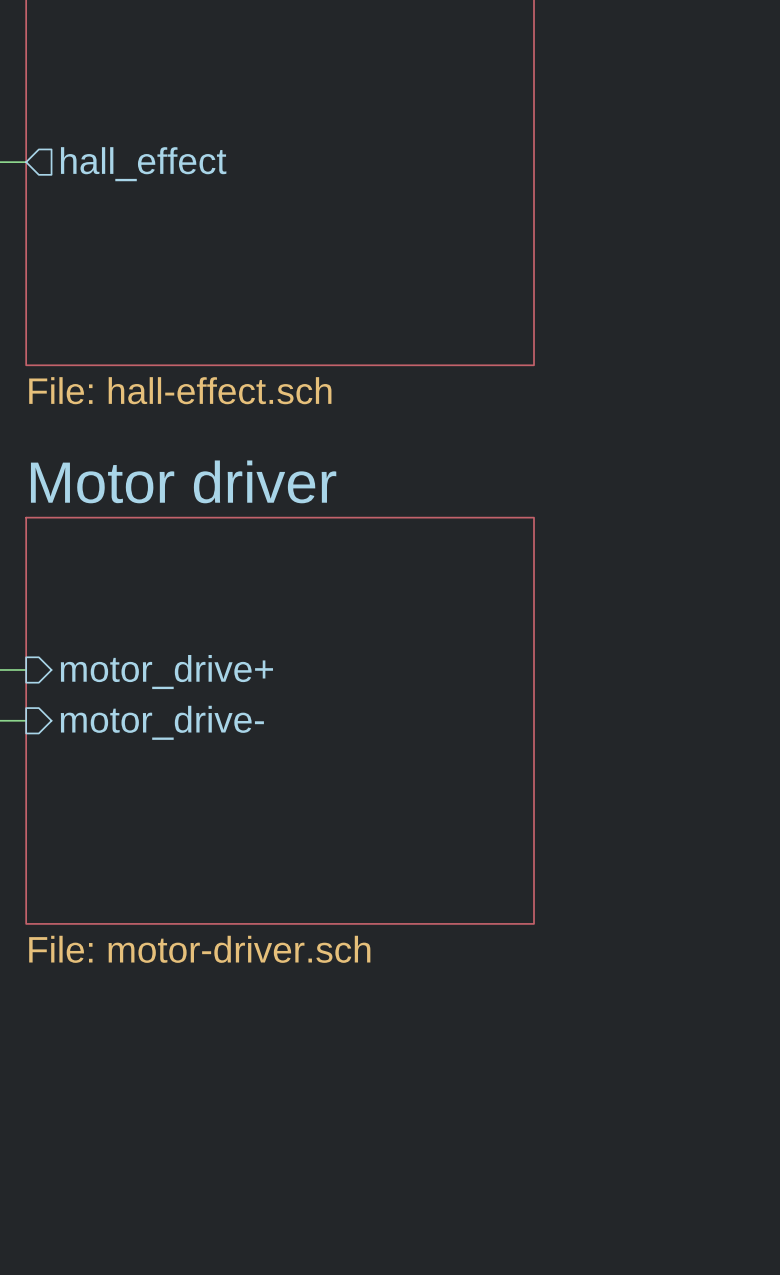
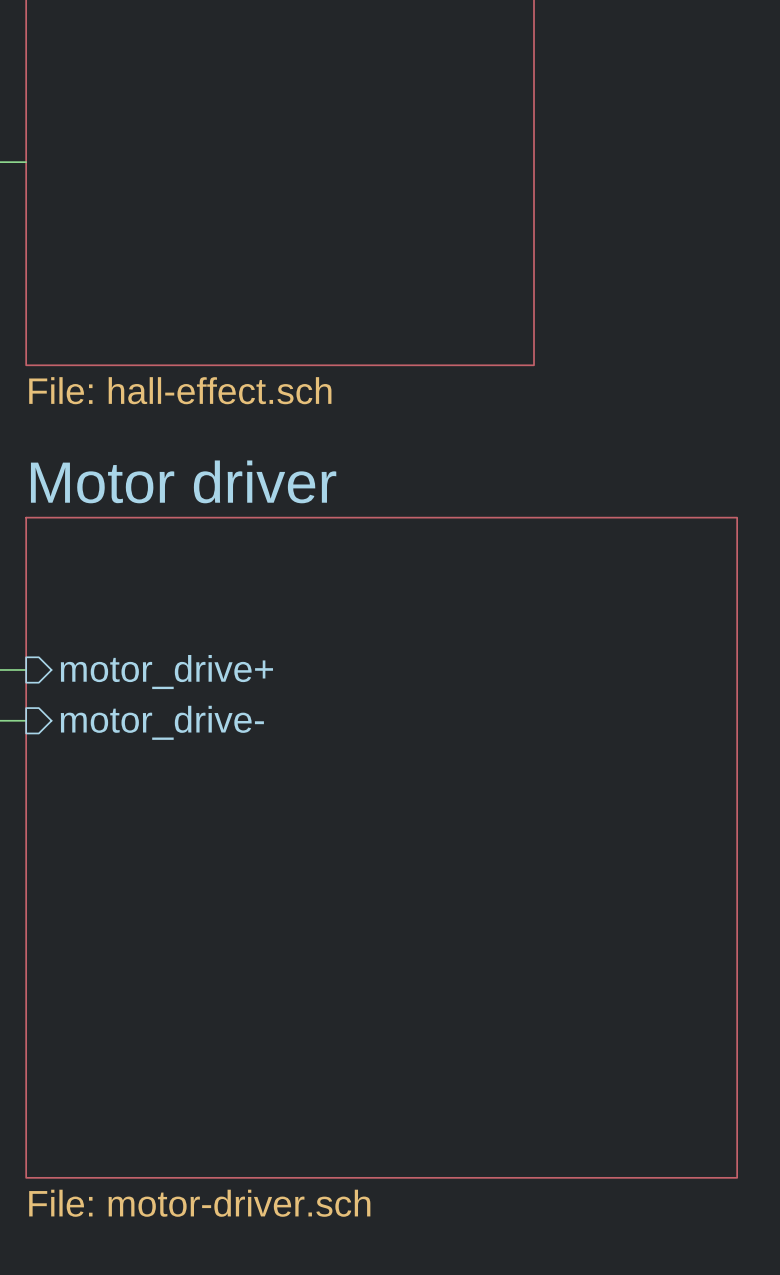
sheet pin: hall_effect (143, 164) -> none
sheet Motor driver: File: motor-driver.sch (280, 720) -> none
sheet Motor driver: none -> File: motor-driver.sch (381, 847)

